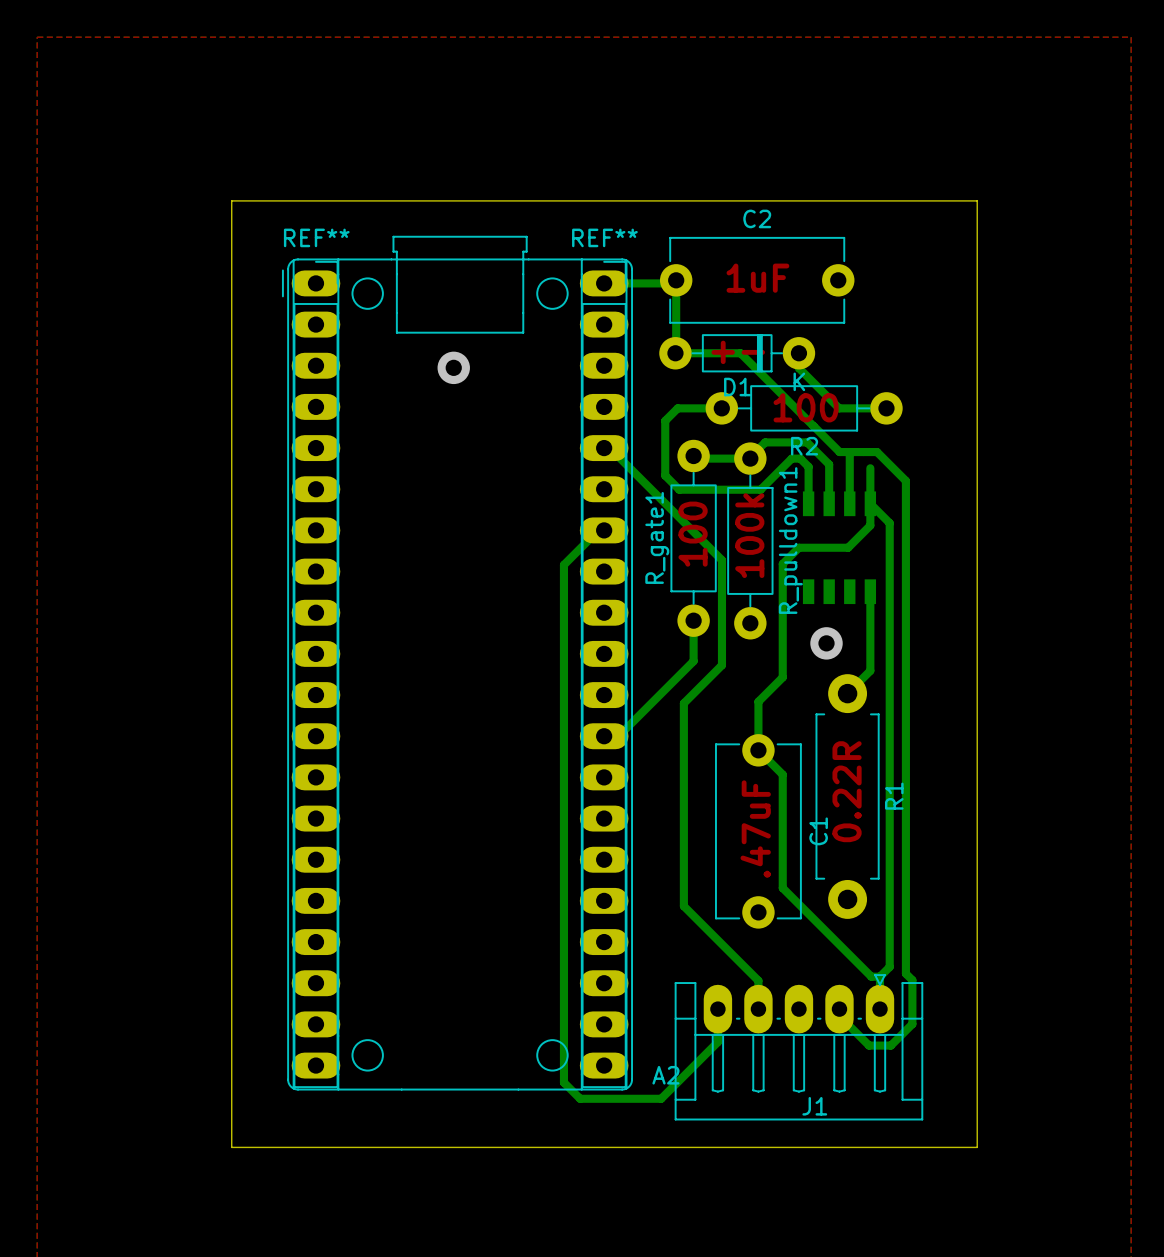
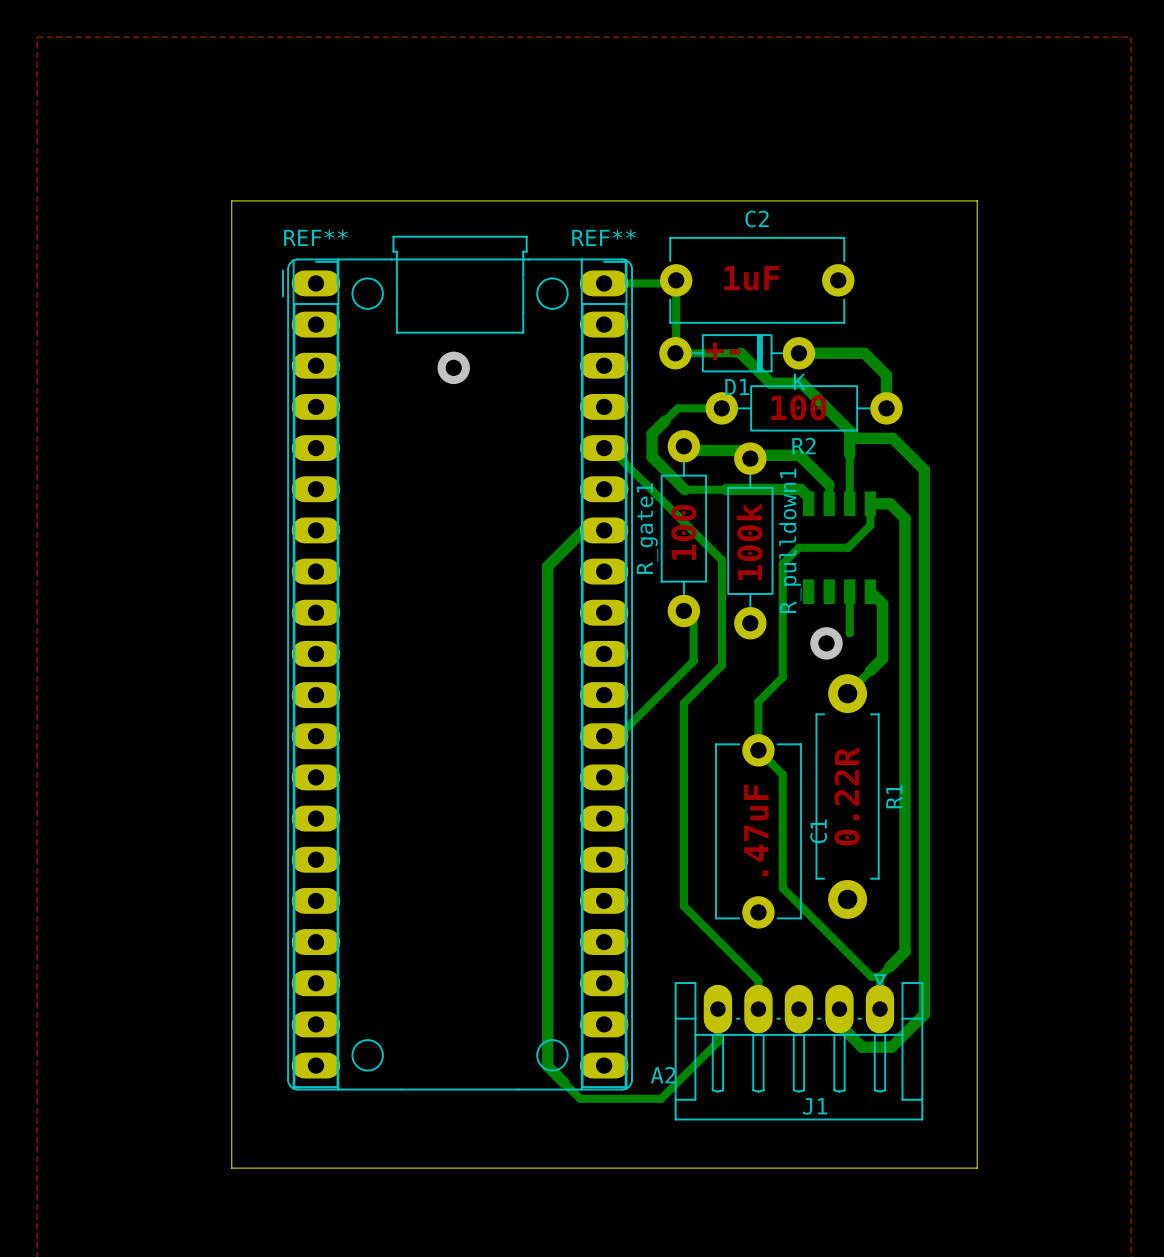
bottom track: (740, 353) (813, 426) -> none
bottom track: (798, 353) (798, 368) (839, 408) (886, 408) -> (798, 353) (864, 353) (886, 375) (886, 395) (893, 402)
bottom track: (665, 420) (665, 475) (679, 489) (684, 489) -> (665, 420) (652, 433) (652, 456) (684, 489)
bottom track: (813, 426) (839, 452) (877, 452) (905, 480) (905, 973) (912, 980) (912, 1024) (890, 1045) (869, 1045) (839, 1015) -> (740, 353) (770, 383) (801, 383) (856, 438) (892, 438) (924, 469) (924, 1014) (891, 1047) (862, 1047) (839, 1024) (839, 1015)
bottom track: none -> (849, 431) (849, 454)
bottom track: none -> (683, 446) (688, 450) (746, 450) (752, 455)
bottom track: (693, 456) (696, 458) (750, 458) (765, 442) (807, 442) (829, 464) (829, 484) -> (752, 455) (799, 455) (829, 484)
bottom track: (870, 468) (870, 503) (889, 523) (889, 966) -> (870, 503) (890, 503) (904, 518) (904, 951) (889, 966)
bottom track: (726, 489) (760, 489) (791, 458) (800, 458) (808, 466) (808, 497) -> (726, 489) (800, 489) (808, 497)
bottom track: (598, 530) (563, 564) (563, 1082) -> (598, 530) (583, 530) (547, 566) (547, 1066) (563, 1082)
text position: 100 (693, 534) -> 100 (683, 532)
R_gate1 position: (693, 538) -> (683, 528)
bottom track: none -> (849, 591) (849, 633)
bottom track: (870, 591) (870, 670) -> (870, 591) (882, 603) (882, 658) (870, 670)
board edge: (231, 1147) (977, 1147) -> (231, 1147) (231, 1168) (977, 1168) (977, 1147)

